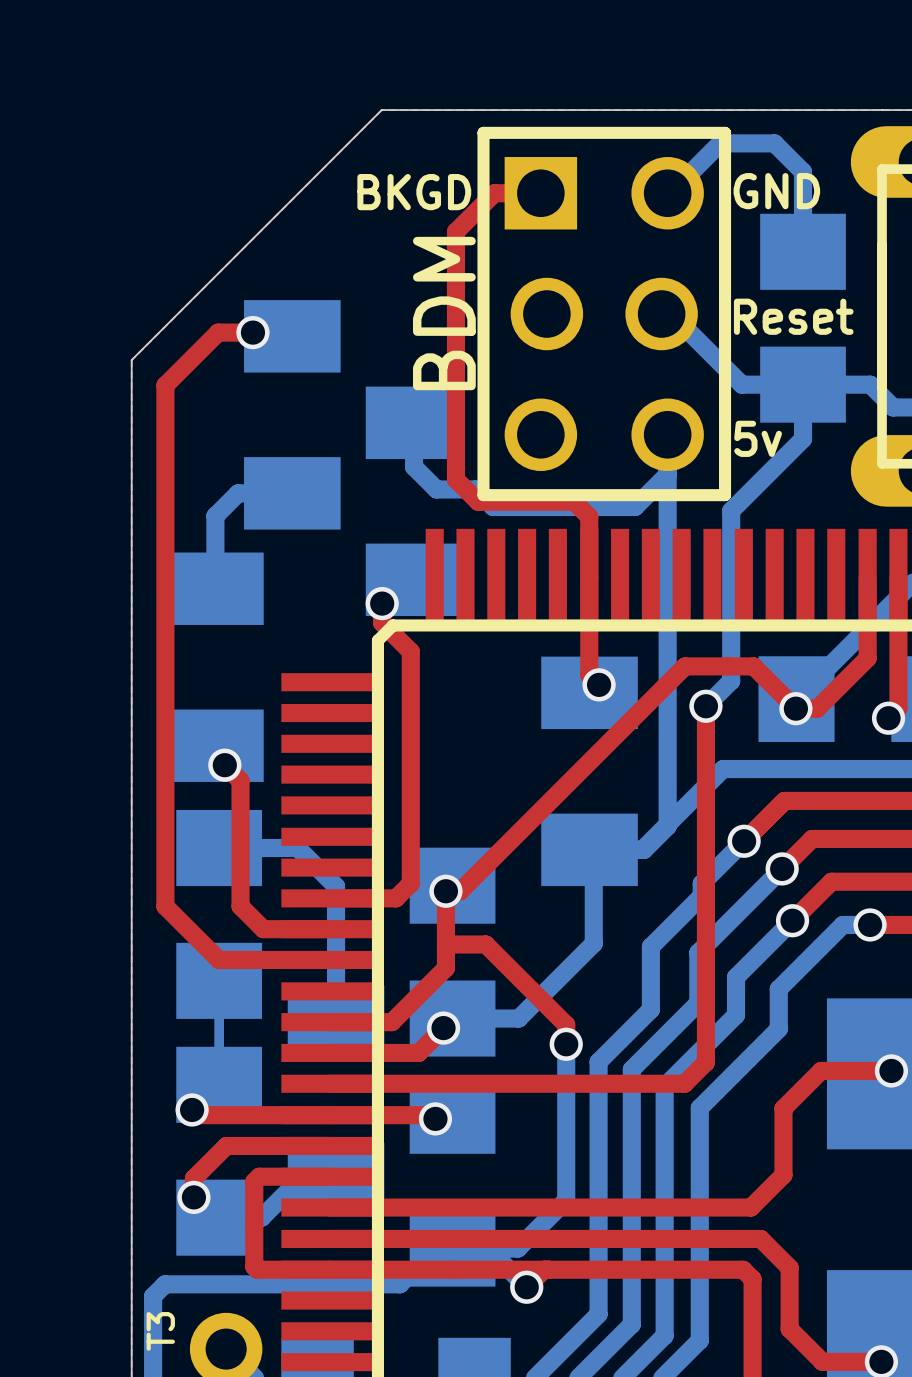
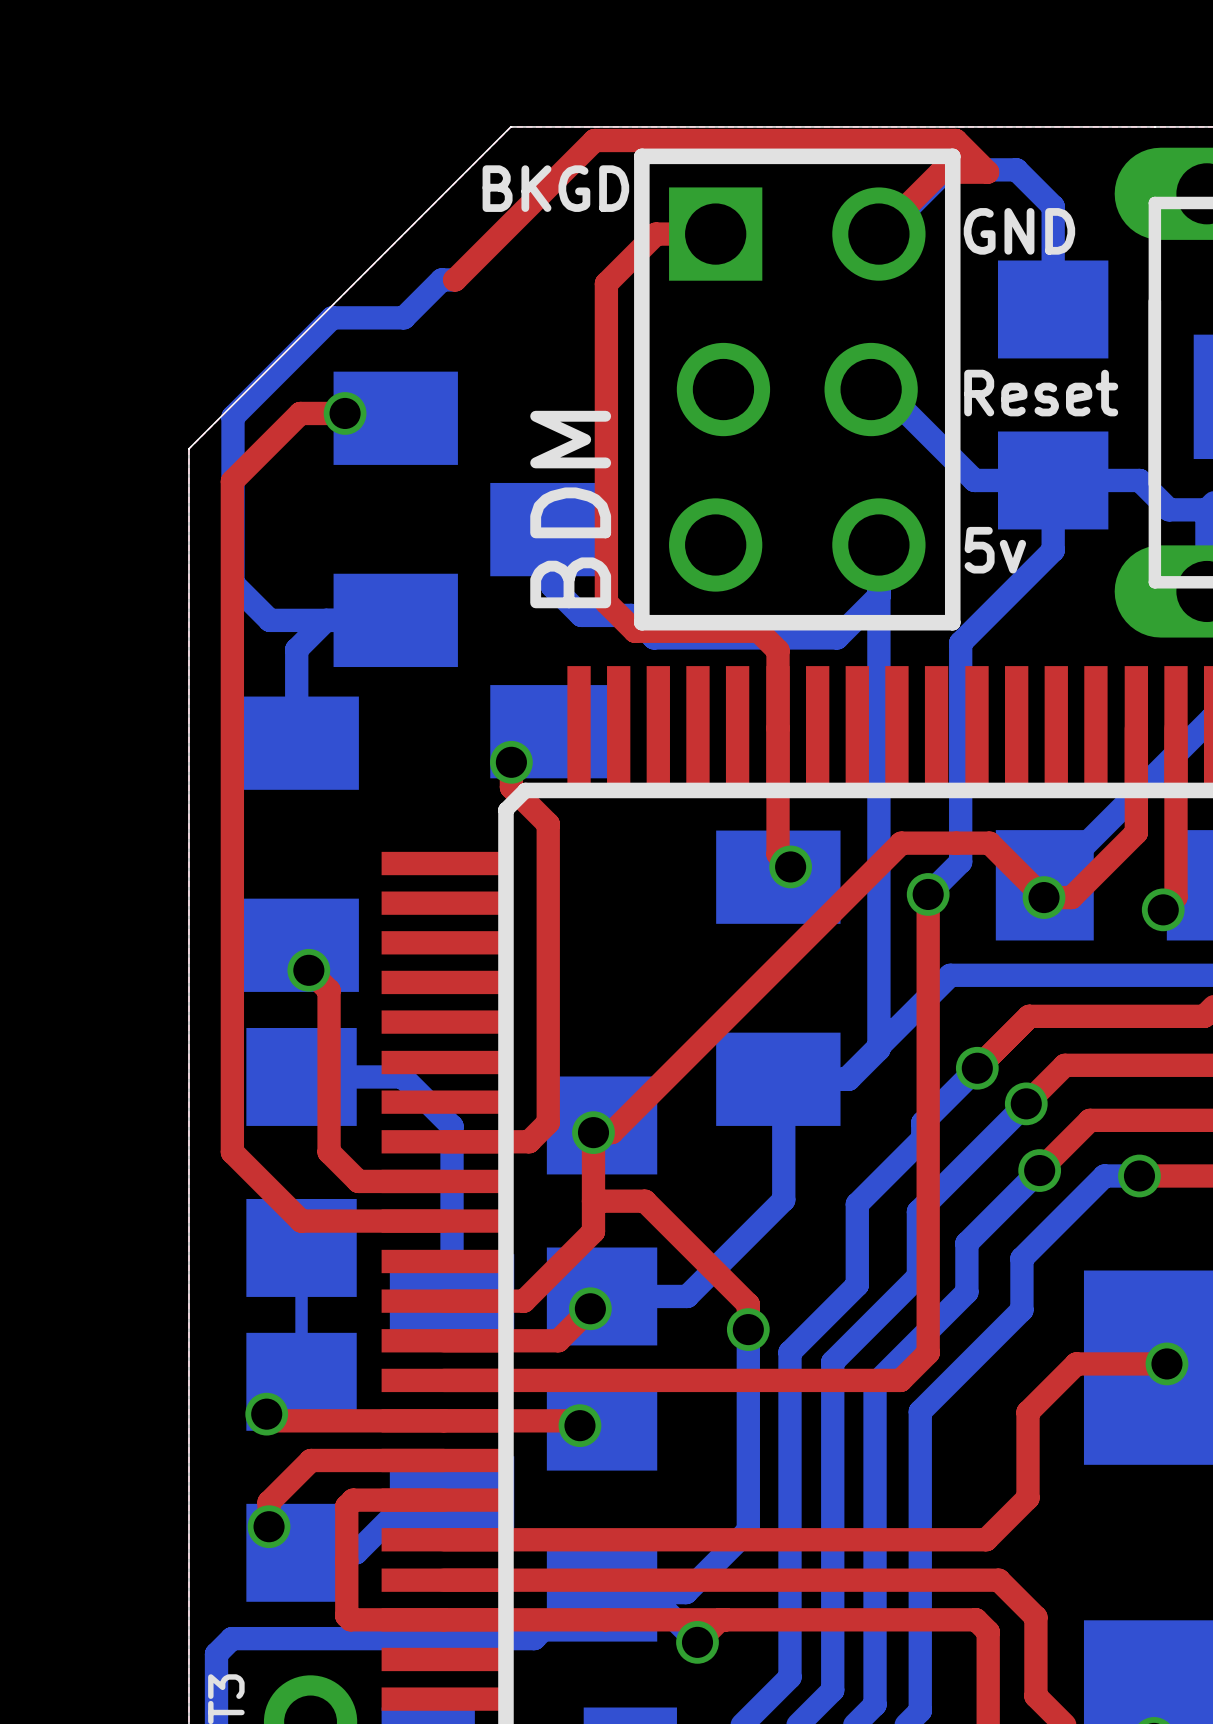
text position: BKGD (414, 192) -> BKGD (555, 188)
top track: none -> (878, 234) (940, 172) (987, 172) (955, 140) (594, 140) (455, 279)
bottom track: none -> (454, 279) (441, 279) (403, 317) (332, 317) (232, 417) (232, 583) (269, 620) (325, 620)
part value position: BDM (444, 313) -> BDM (570, 509)

